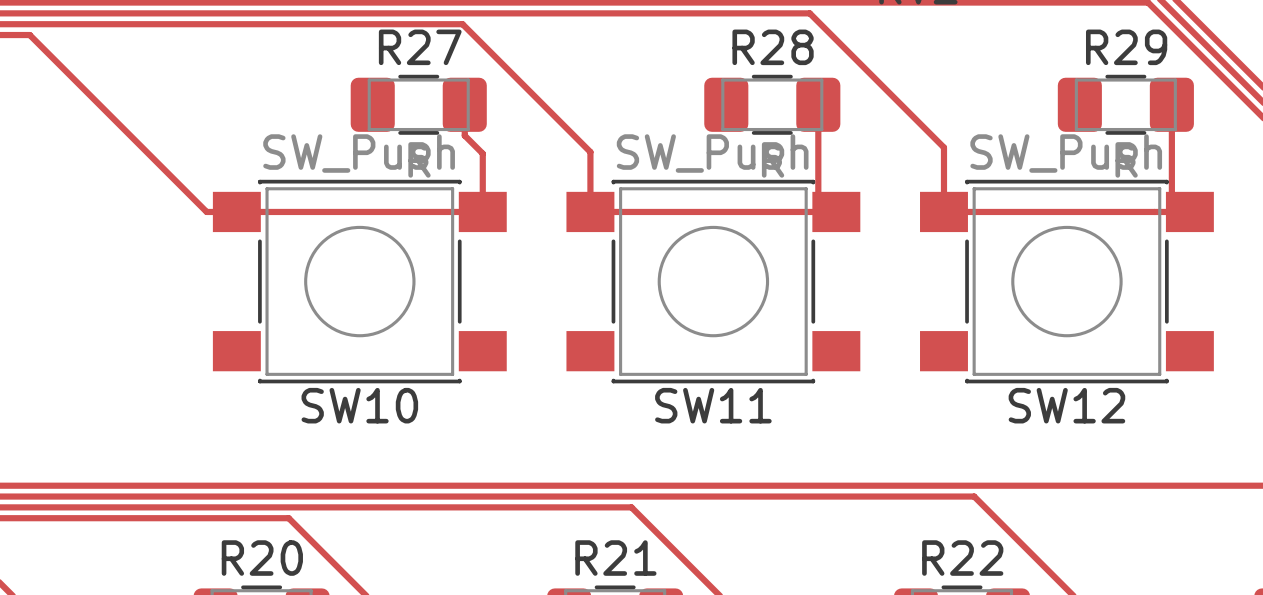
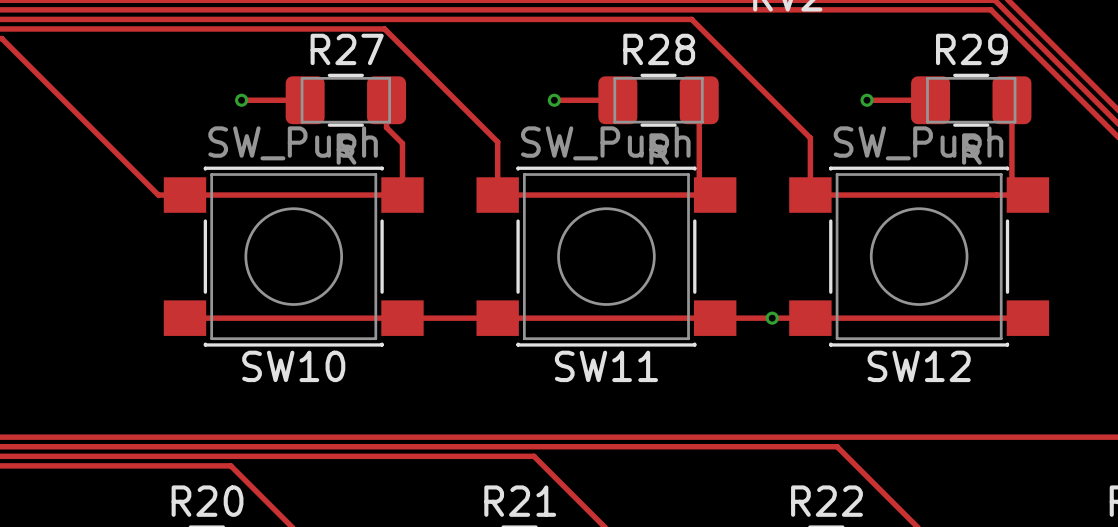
track: none -> (241, 100) (305, 100)
via: none -> (241, 100)
track: none -> (554, 100) (617, 100)
via: none -> (554, 100)
track: none -> (867, 100) (930, 100)
via: none -> (867, 100)
track: none -> (184, 318) (1027, 318)
via: none -> (772, 318)

